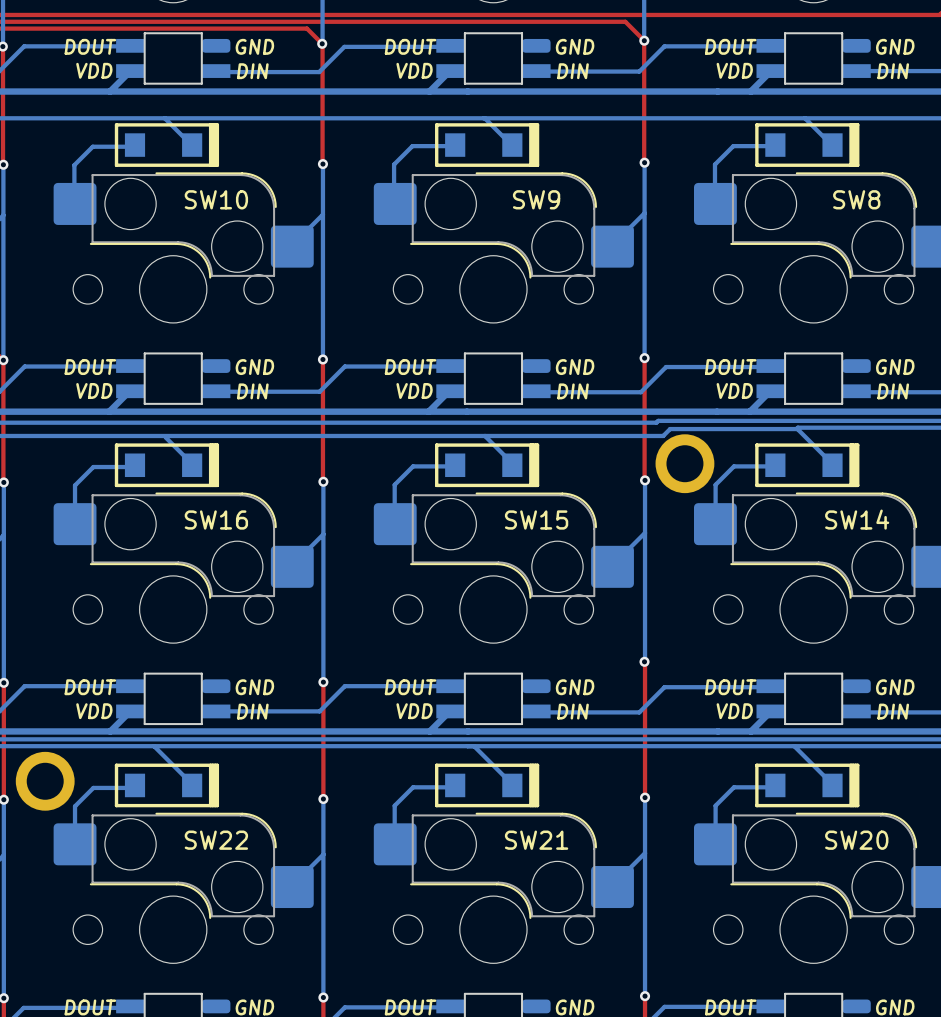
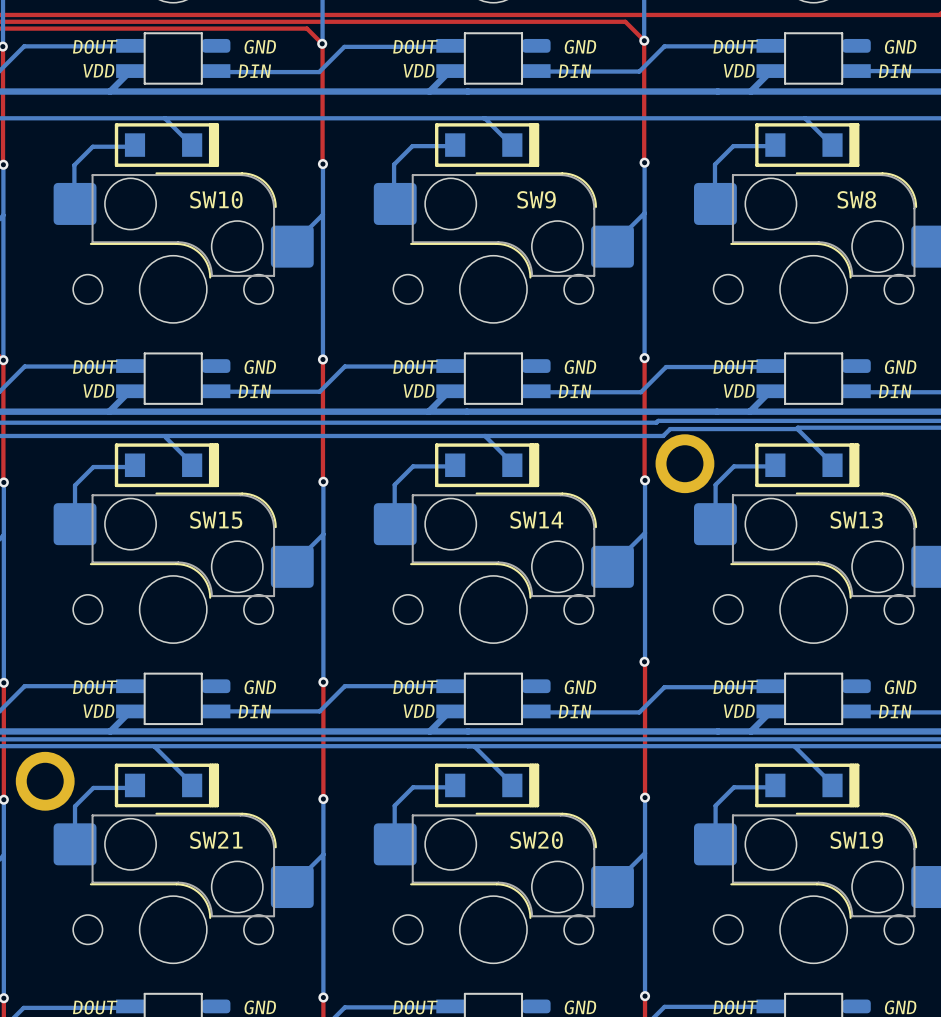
SW16 name: SW16 (216, 519) -> SW15 (216, 520)
SW15 name: SW15 (536, 519) -> SW14 (536, 520)
SW14 name: SW14 (857, 519) -> SW13 (856, 520)
SW22 name: SW22 (216, 840) -> SW21 (216, 840)
SW21 name: SW21 (536, 840) -> SW20 (536, 840)
SW20 name: SW20 (856, 840) -> SW19 (856, 840)

